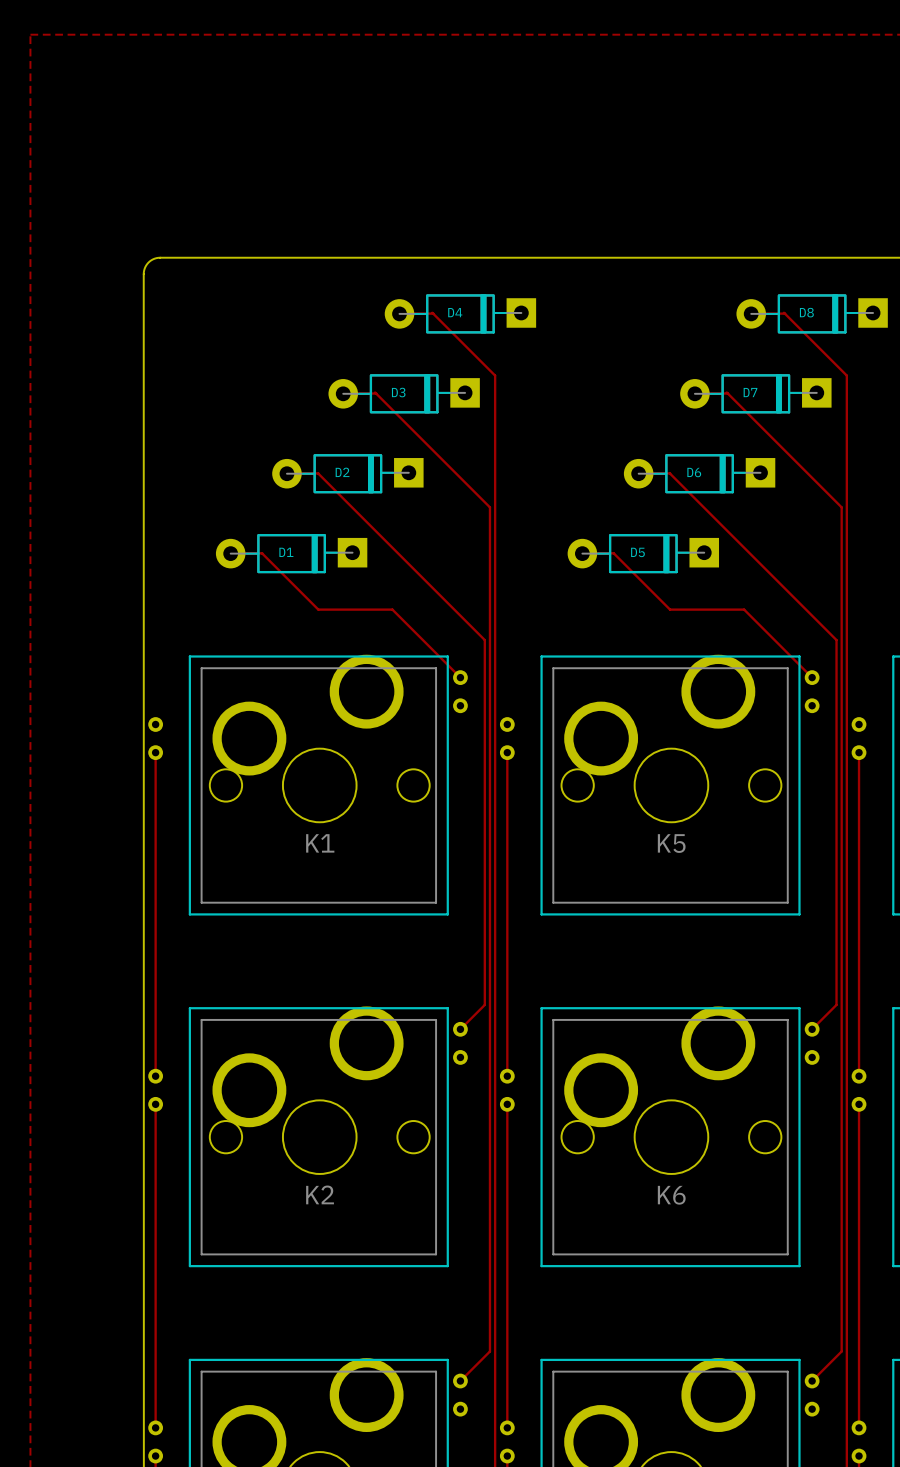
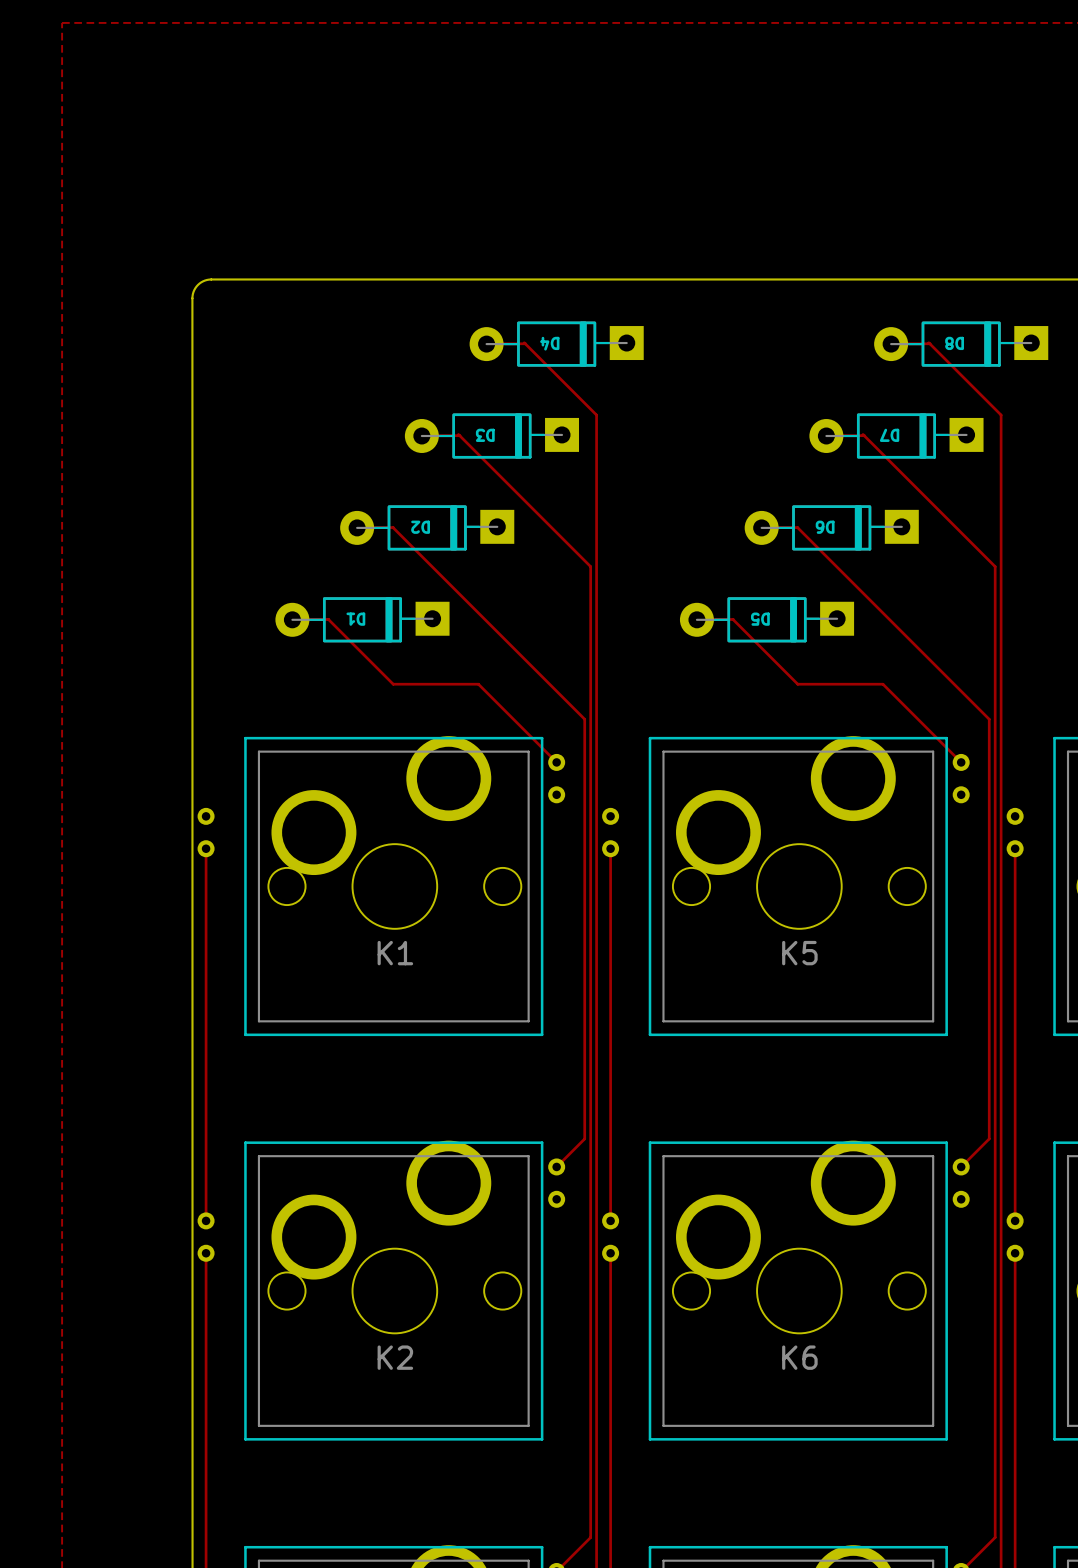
D4 name rotation: 0° (455, 312) -> 180° (549, 343)
D8 name rotation: 0° (806, 312) -> 180° (954, 343)
D3 name rotation: 0° (398, 392) -> 180° (485, 435)
D7 name rotation: 0° (750, 392) -> 180° (889, 435)
D2 name rotation: 0° (342, 472) -> 180° (420, 527)
D6 name rotation: 0° (694, 472) -> 180° (825, 527)
D1 name rotation: 0° (286, 552) -> 180° (355, 619)
D5 name rotation: 0° (637, 552) -> 180° (760, 619)

